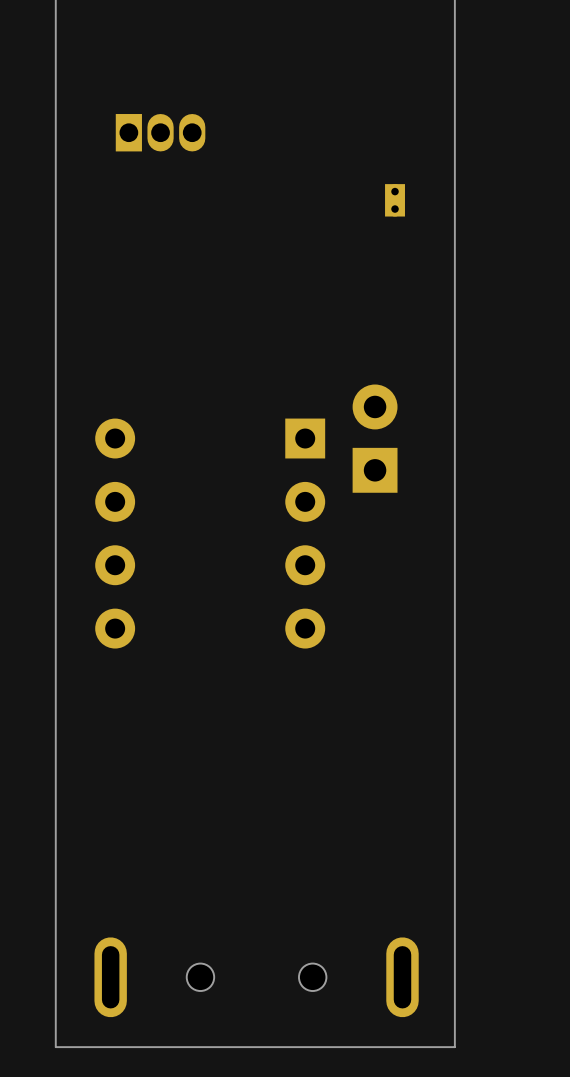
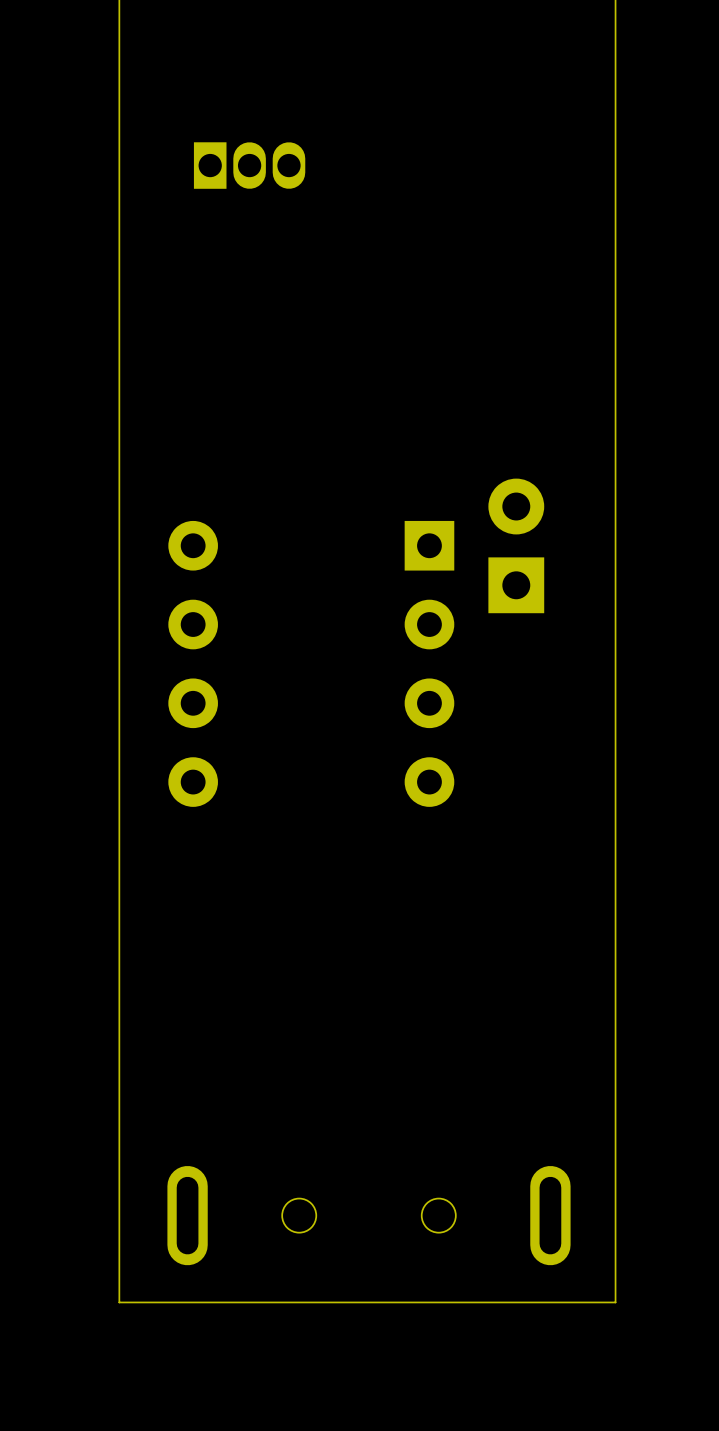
part: (395, 200) -> none

